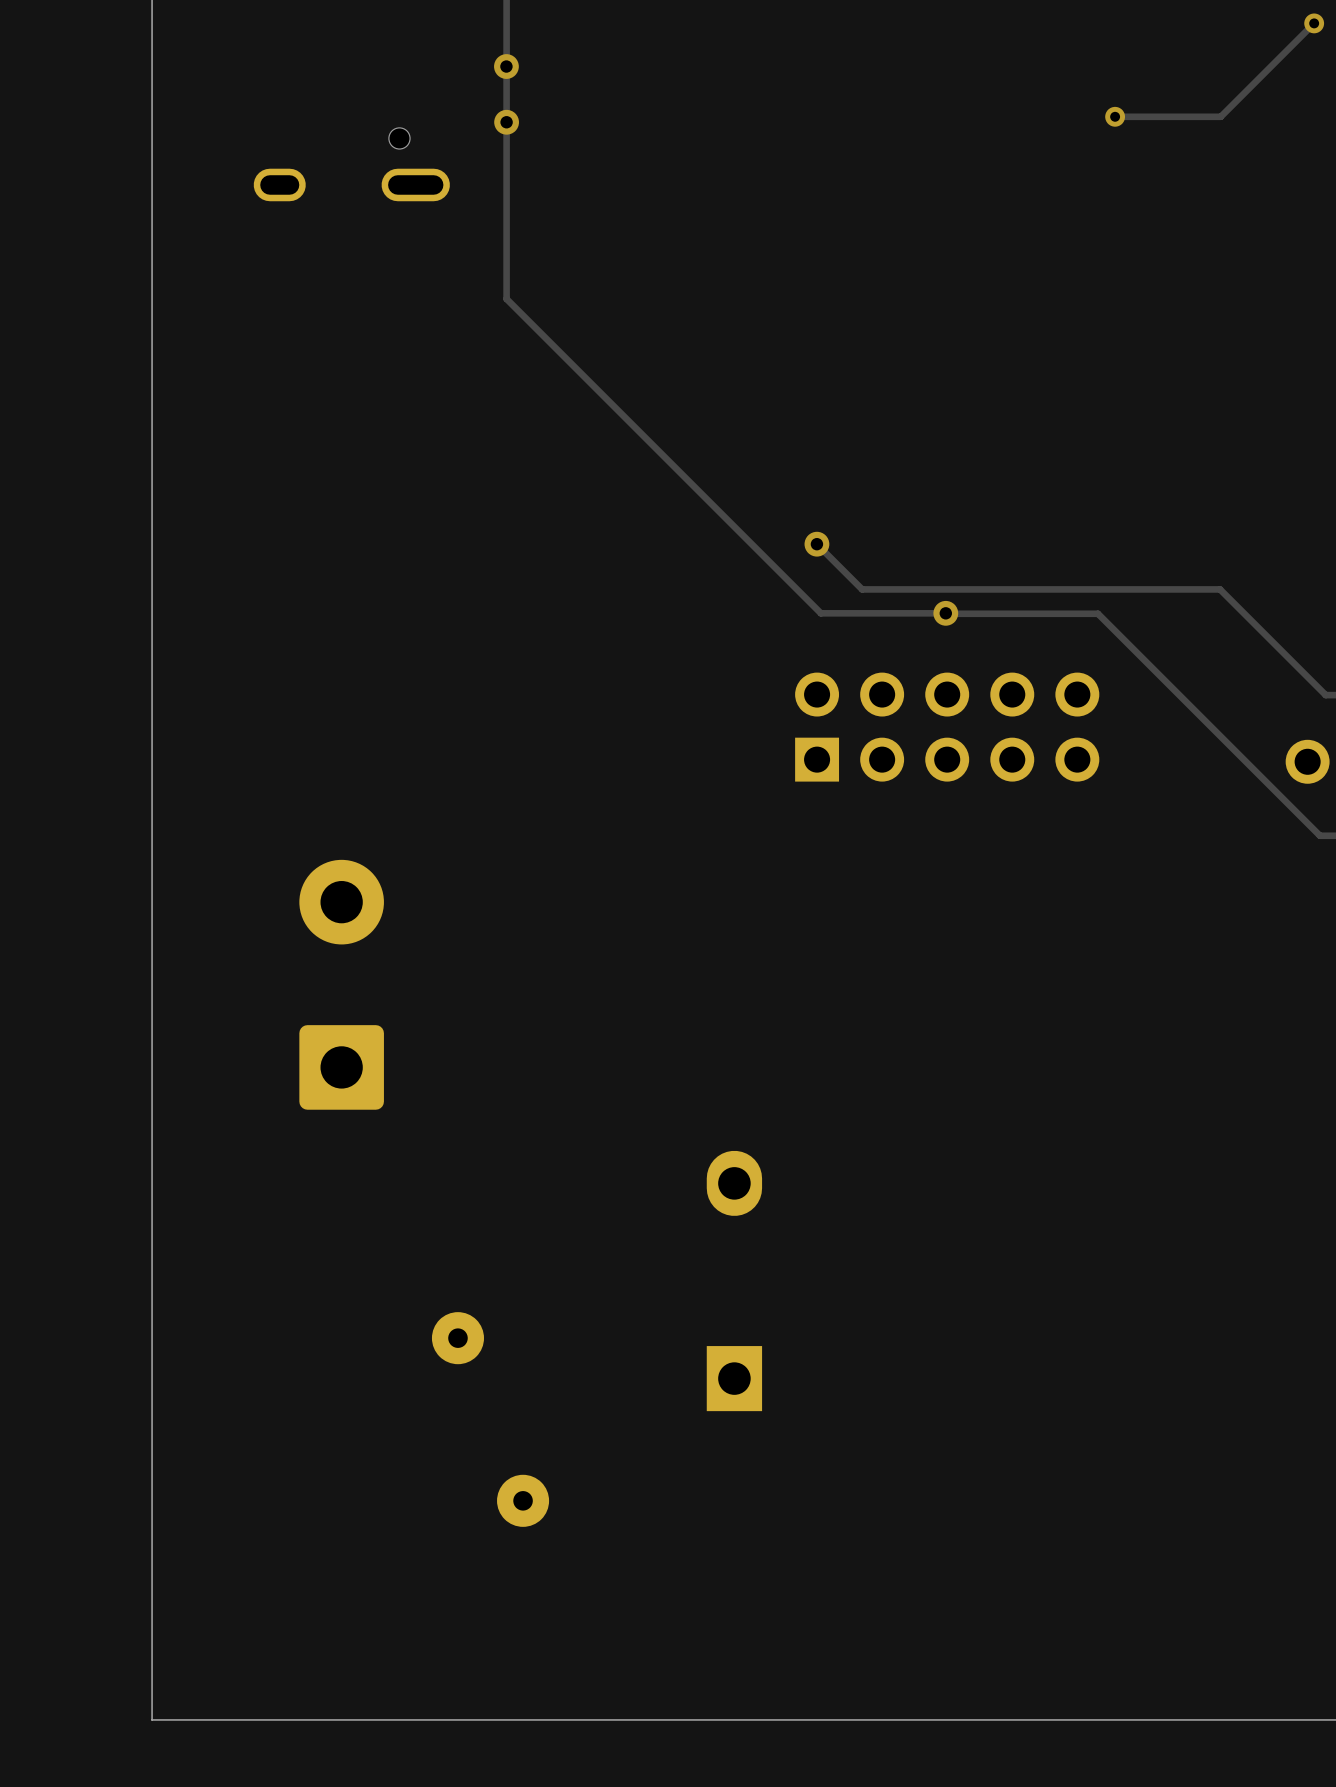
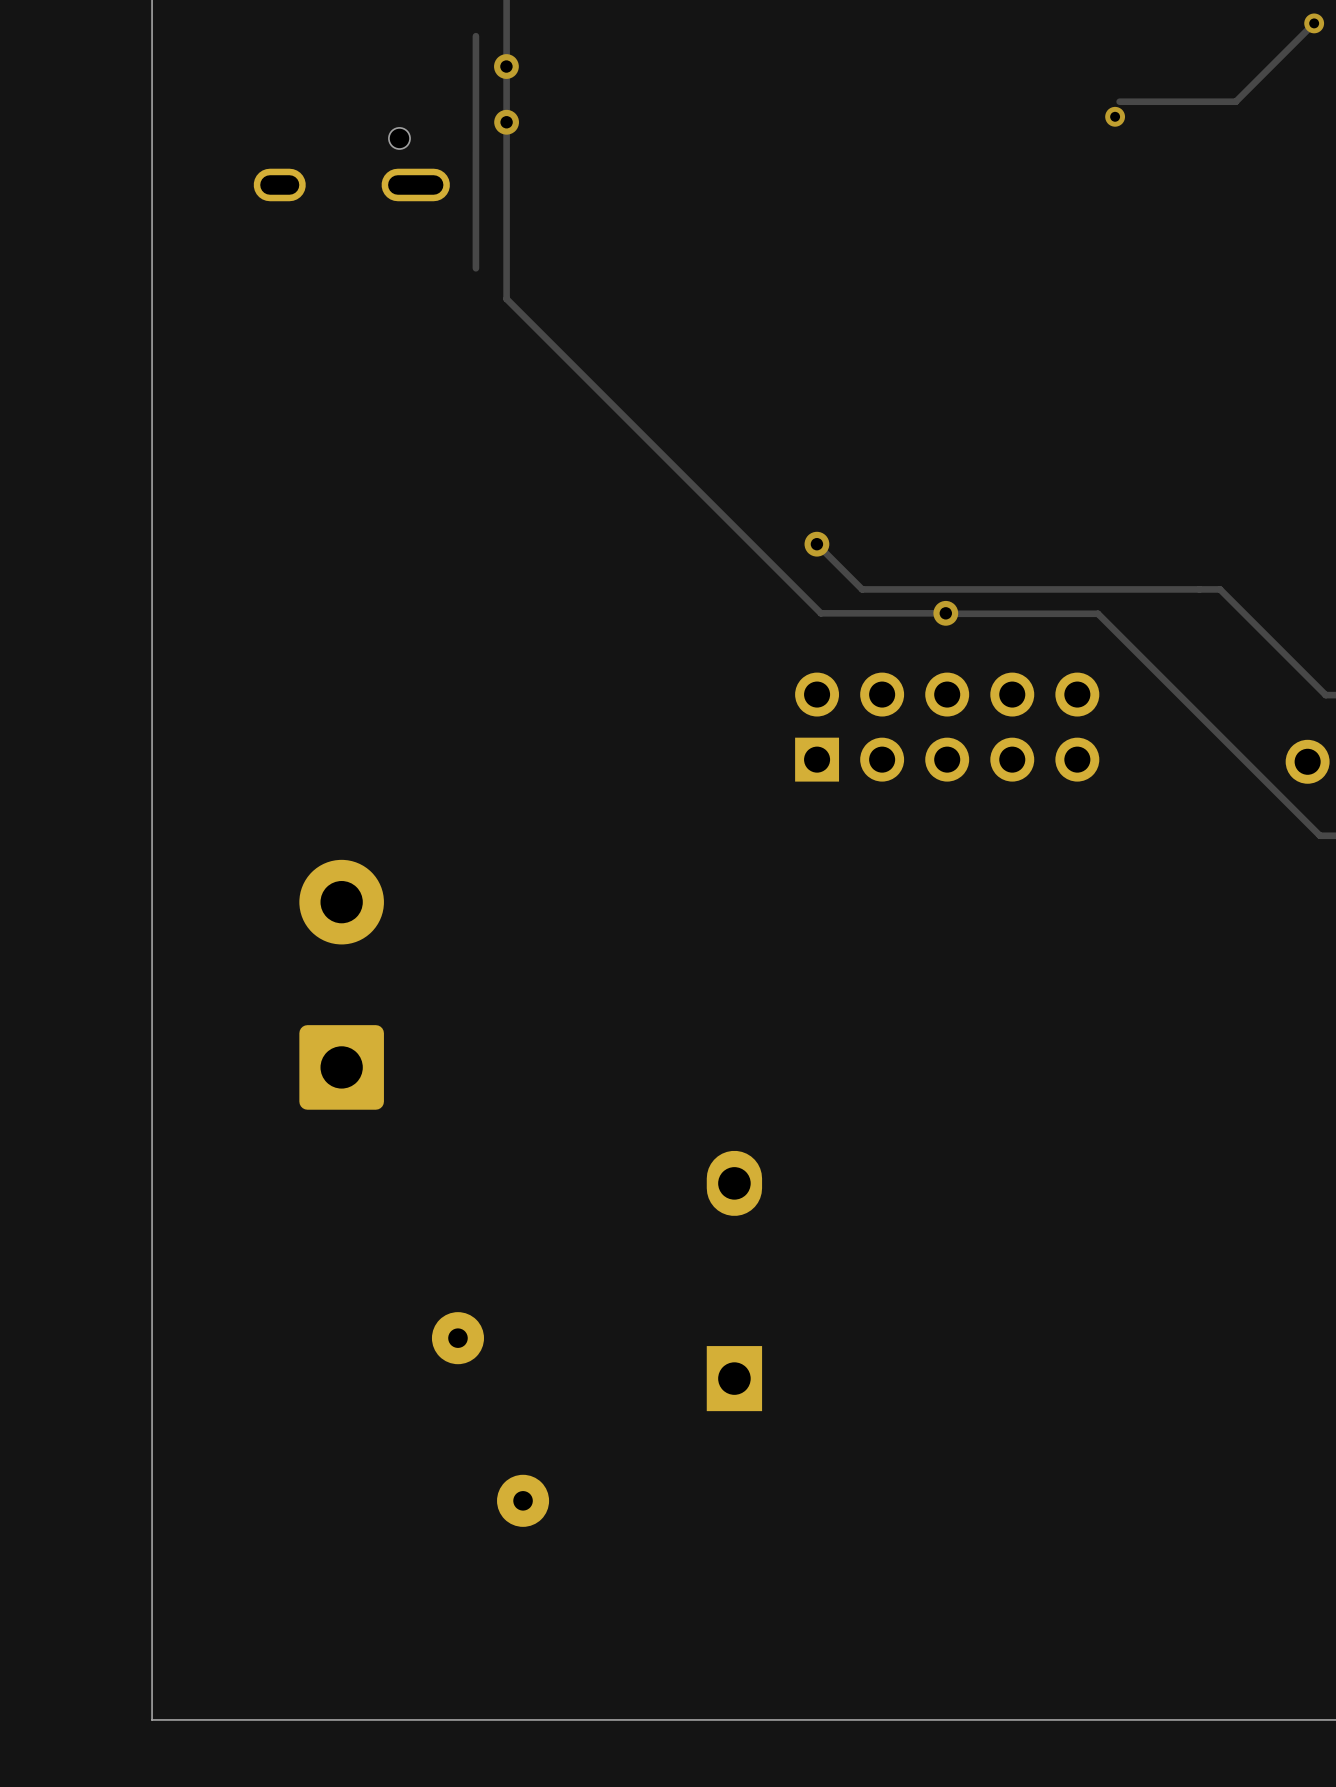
track: none -> (475, 36) (475, 268)
track: (1235, 101) (1220, 116) (1115, 116) -> (1235, 101) (1119, 101)

